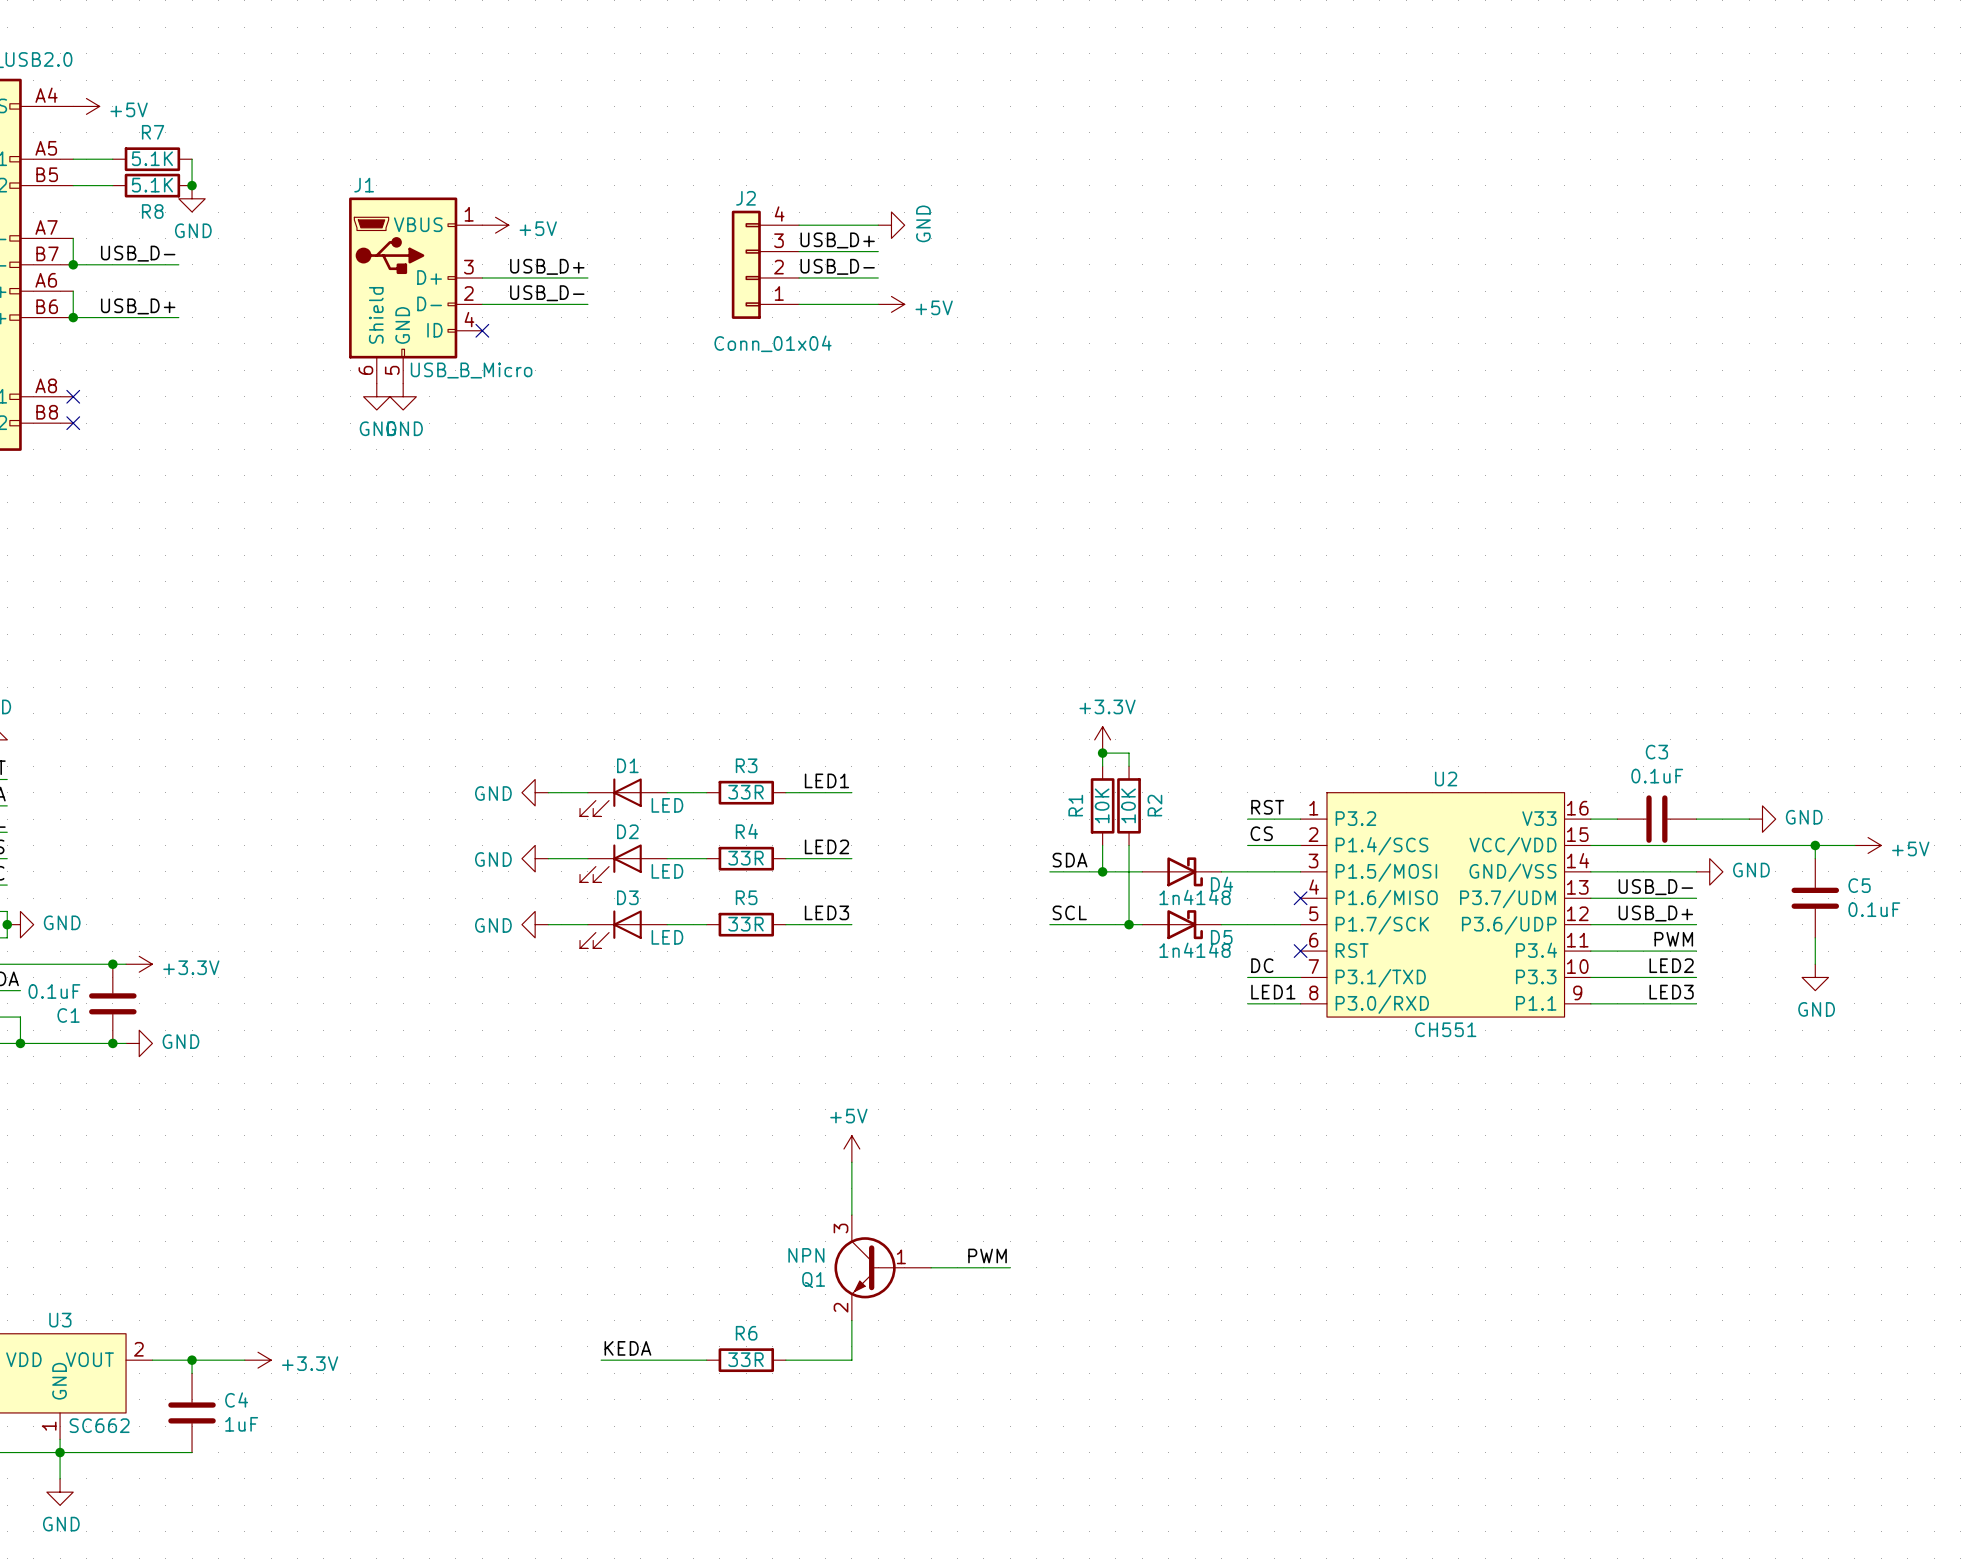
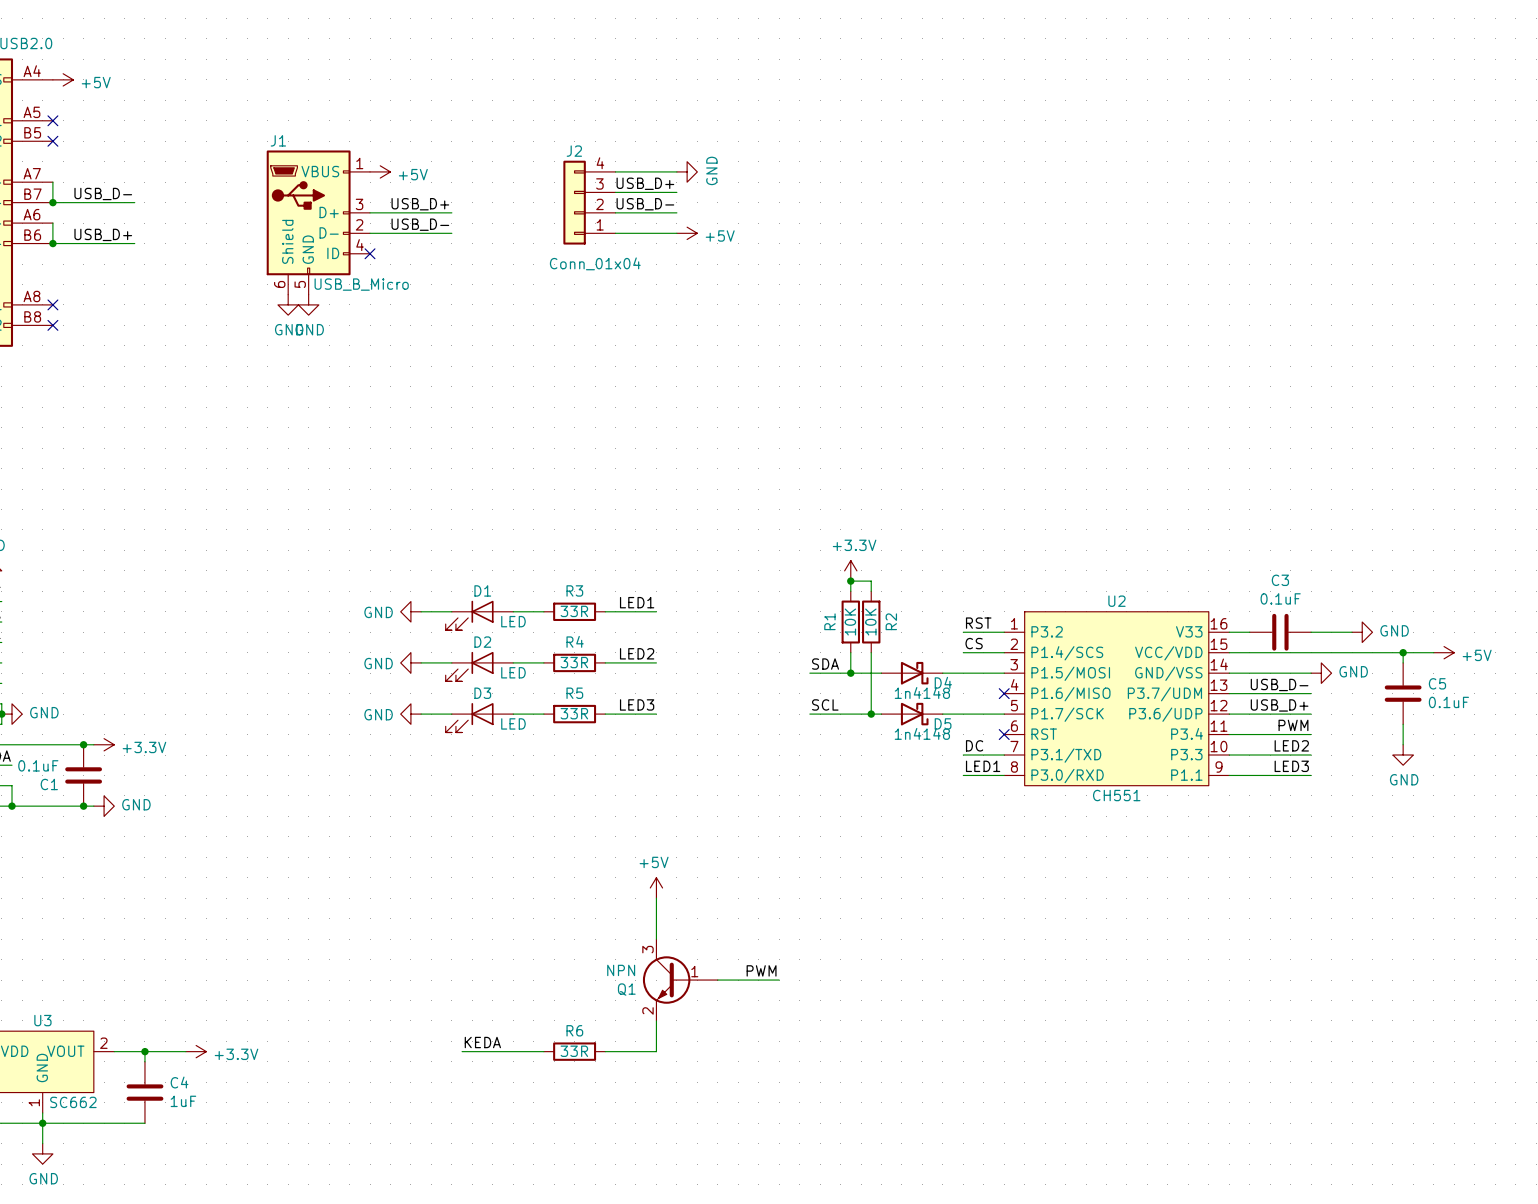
wire: (73, 159) (112, 159) -> none
no-connect mark: none -> (52, 120)
R7: 5.1K (152, 159) -> none
wire: (192, 159) (192, 185) -> none
wire: (73, 185) (112, 185) -> none
no-connect mark: none -> (52, 141)
R8: 5.1K (152, 185) -> none
junction: (192, 185) -> none
power symbol: GND (192, 198) -> none

